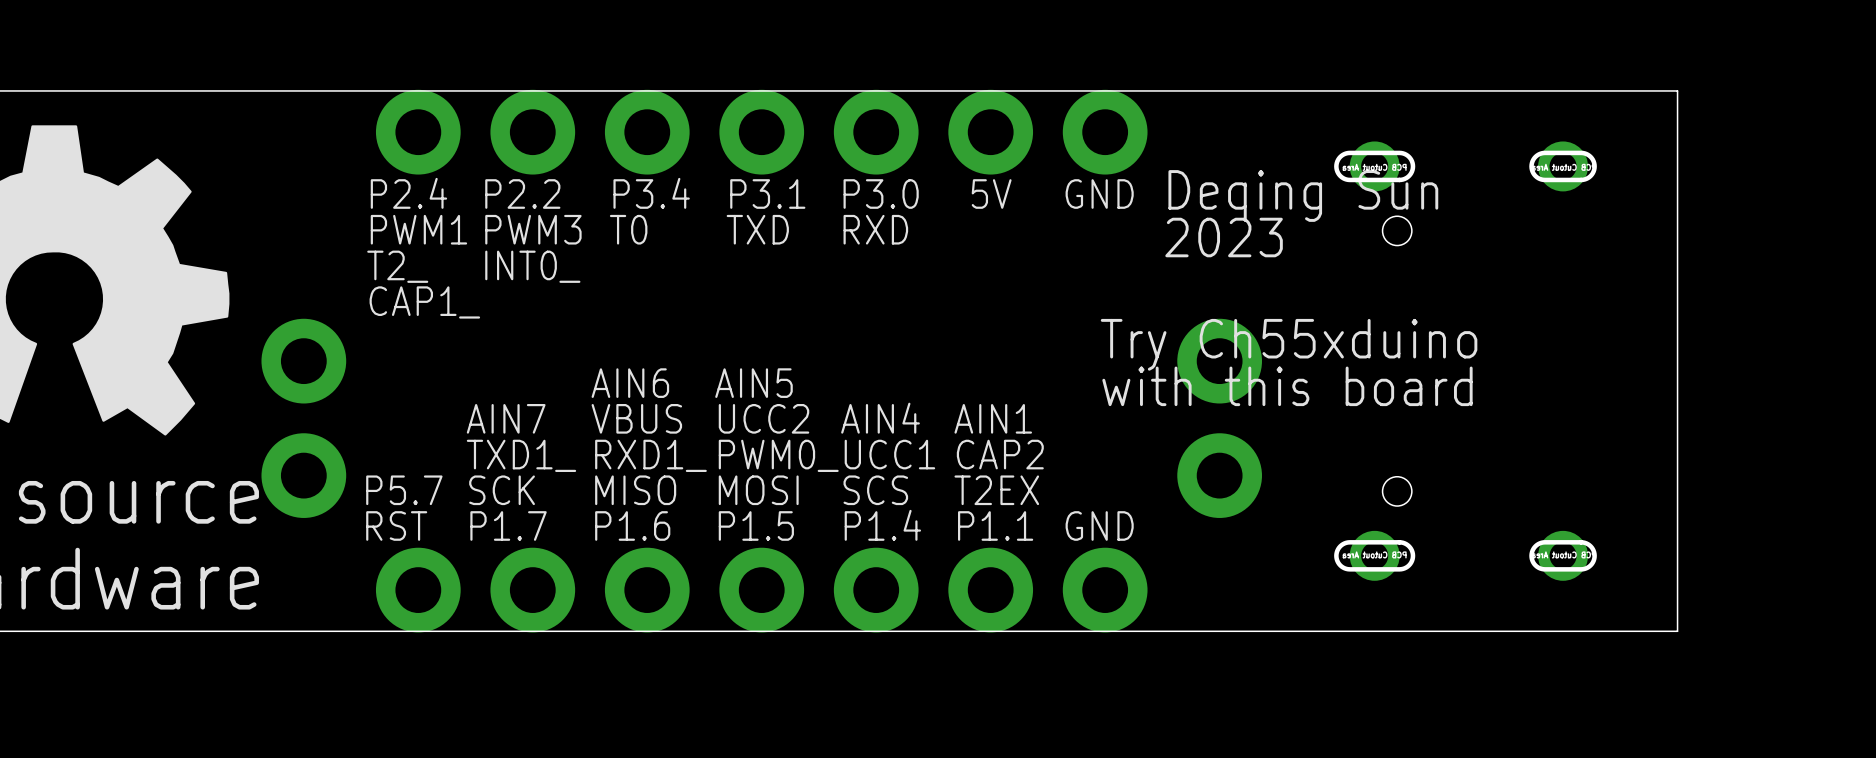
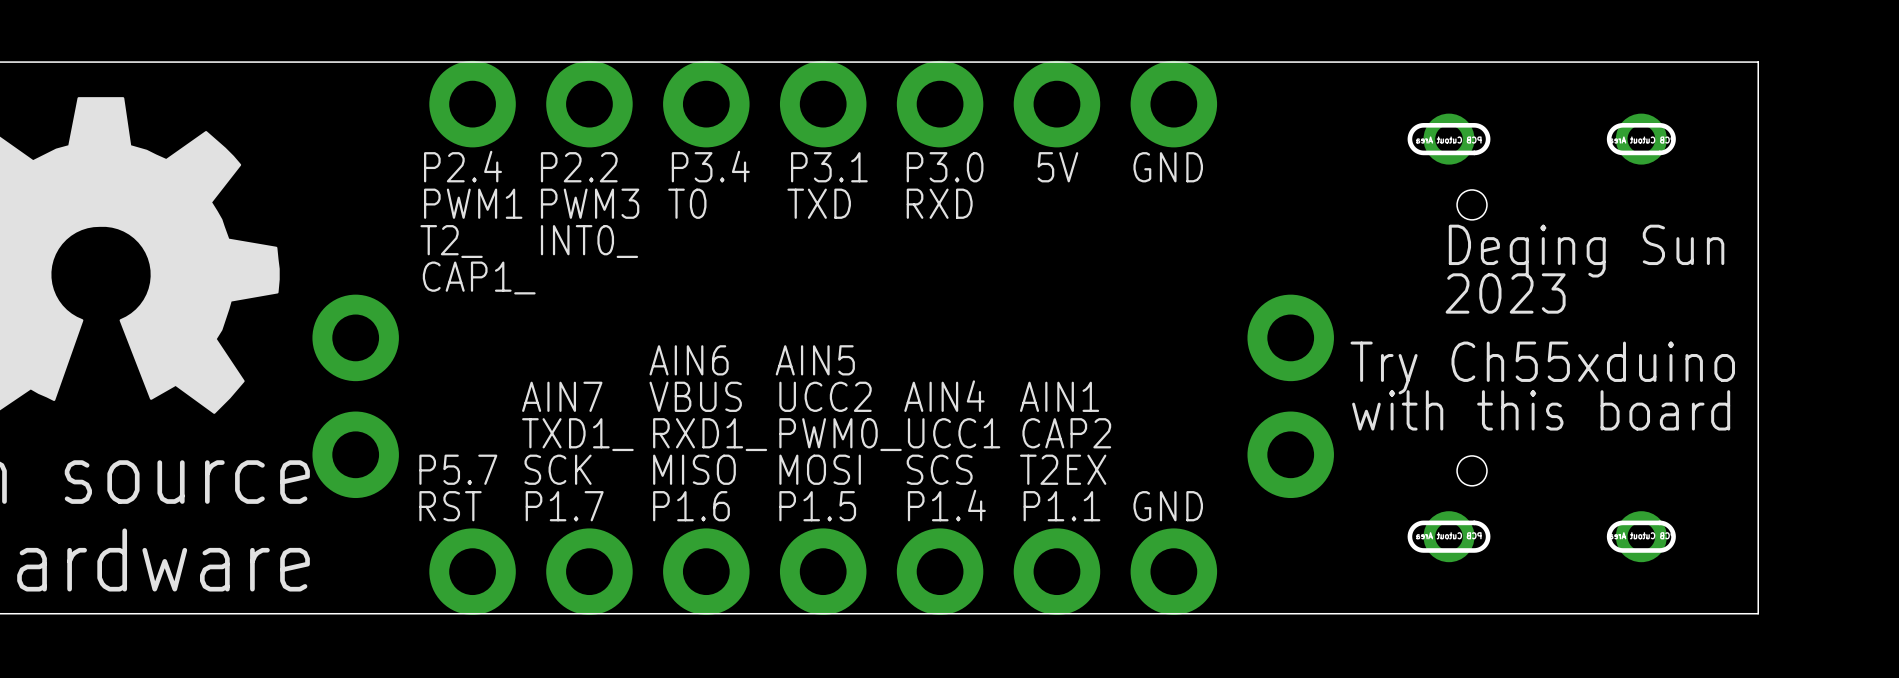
text position: Deqing Sun (1303, 195) -> Deqing Sun (1586, 251)
text position: 2023 (1224, 237) -> 2023 (1505, 293)
text position: Try Ch55xduino (1289, 344) -> Try Ch55xduino (1542, 367)
text position: with this board (1287, 386) -> with this board (1541, 410)

